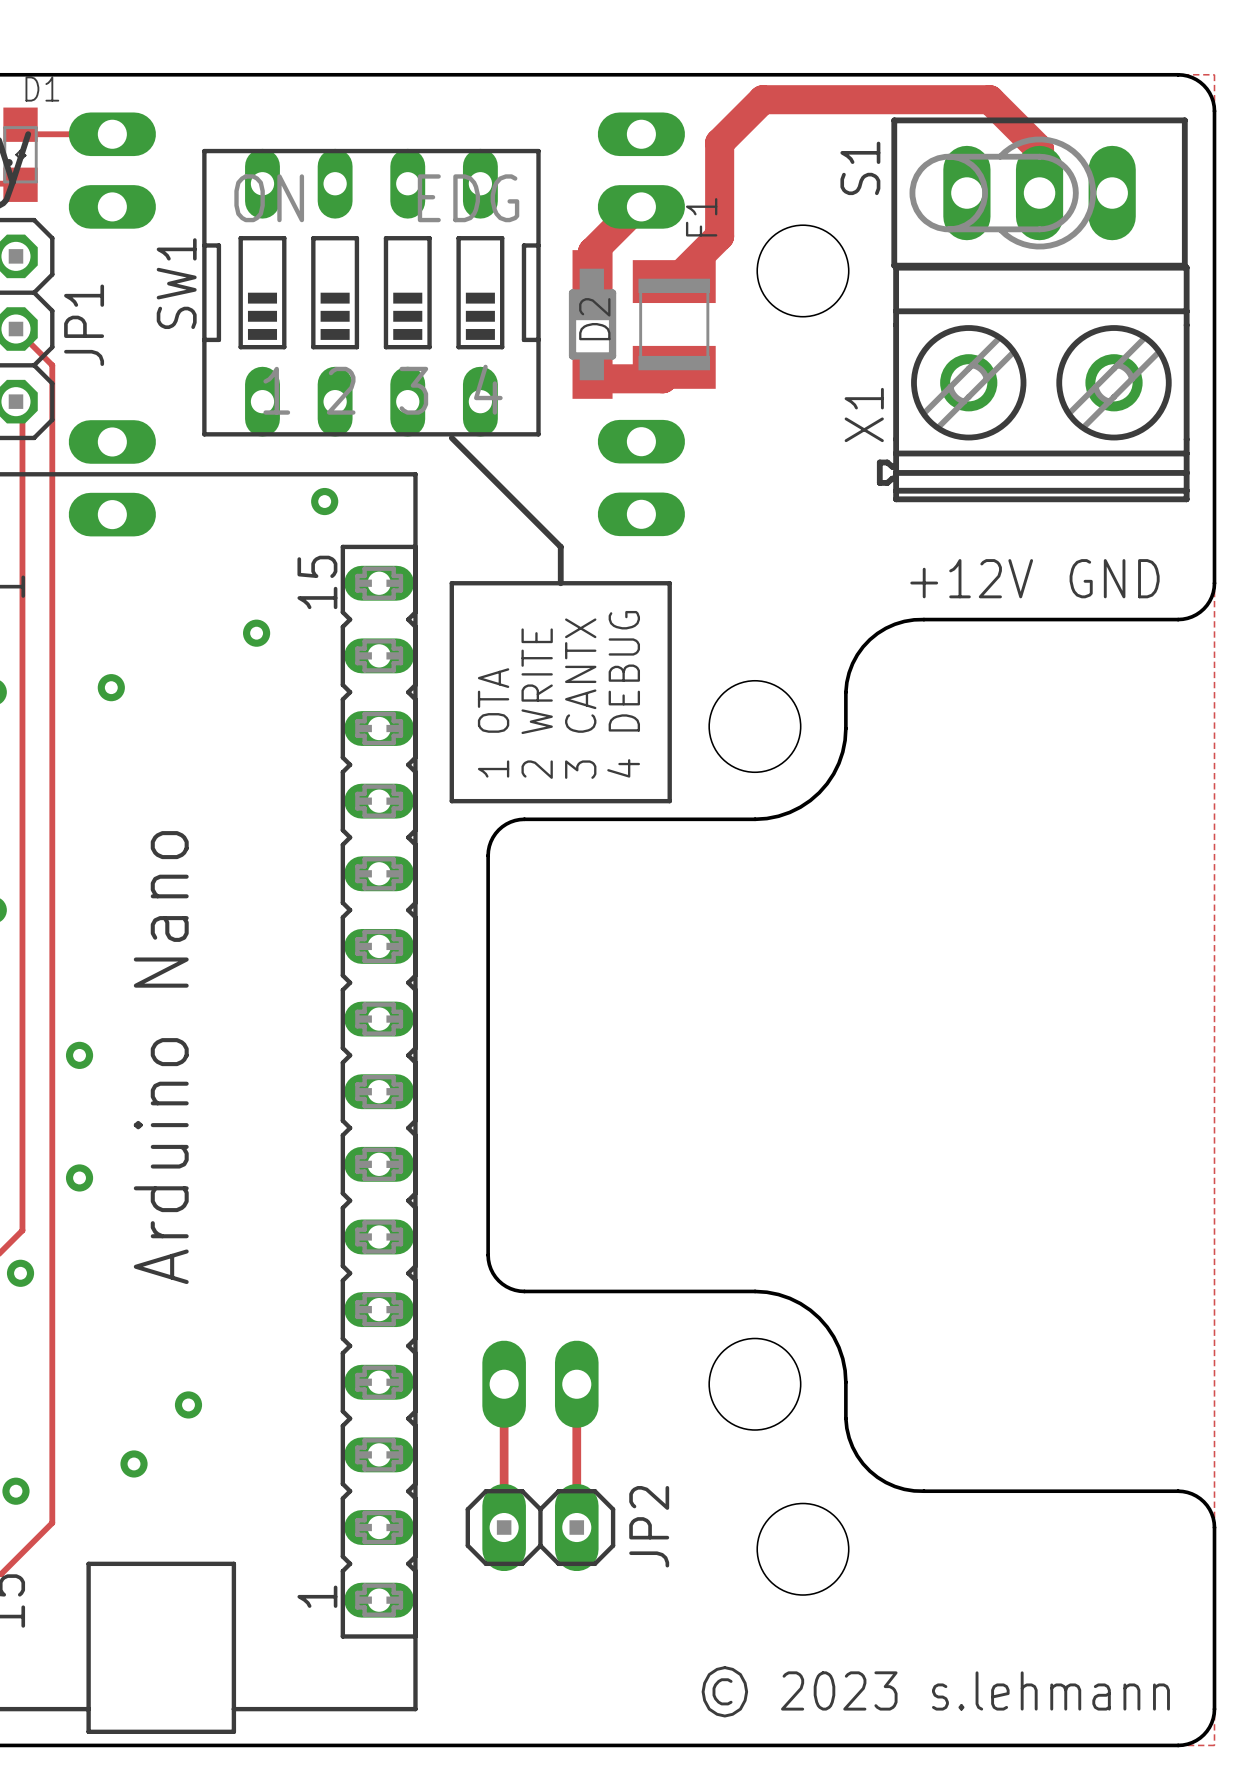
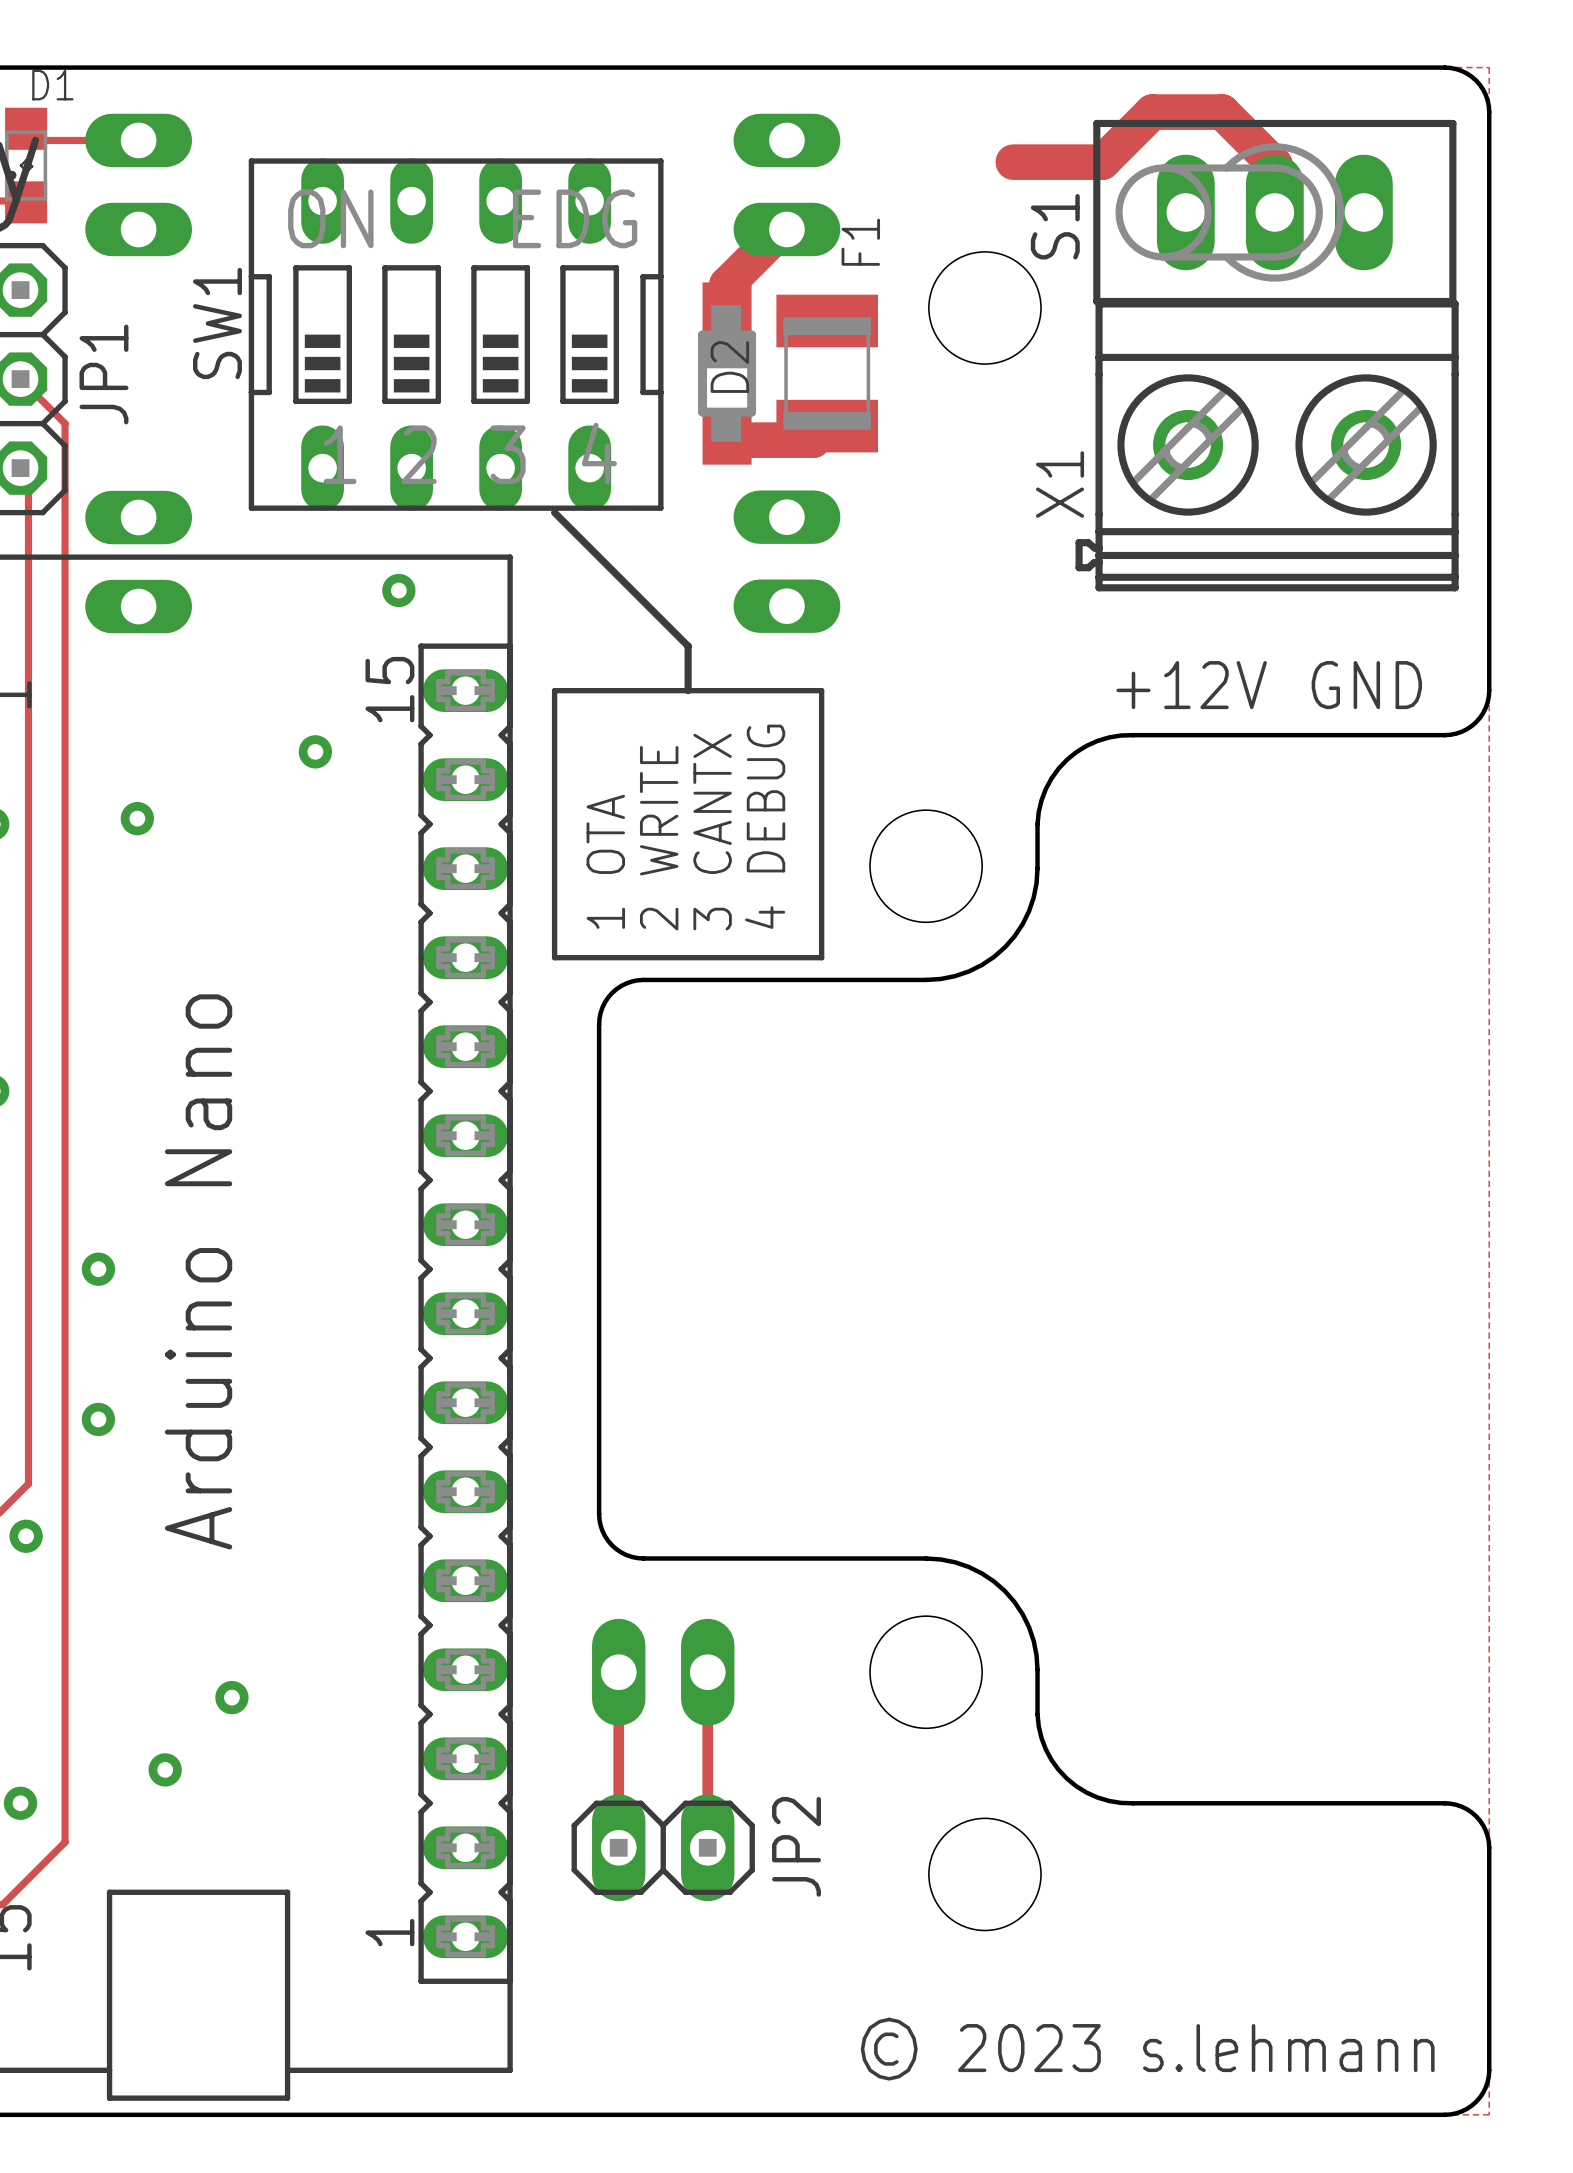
track: (1039, 154) (1039, 149) (989, 99) (762, 99) (719, 142) (719, 236) (674, 281) -> (1274, 164) (1222, 112) (1152, 112) (1102, 162) (1013, 162)
S1 name position: S1 (860, 168) -> S1 (1055, 226)

